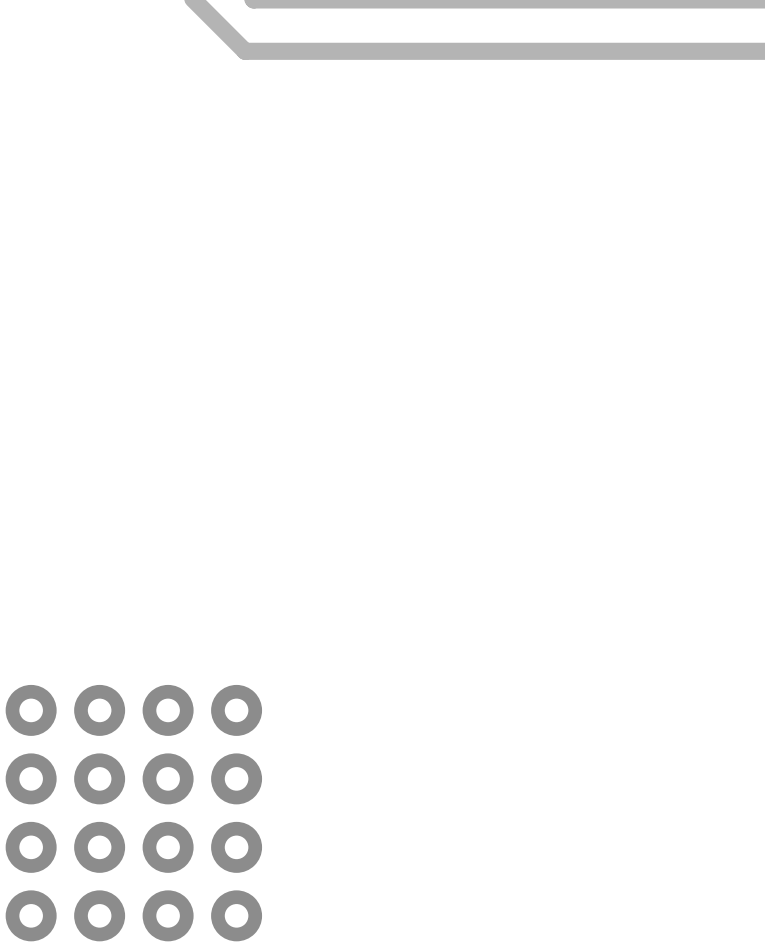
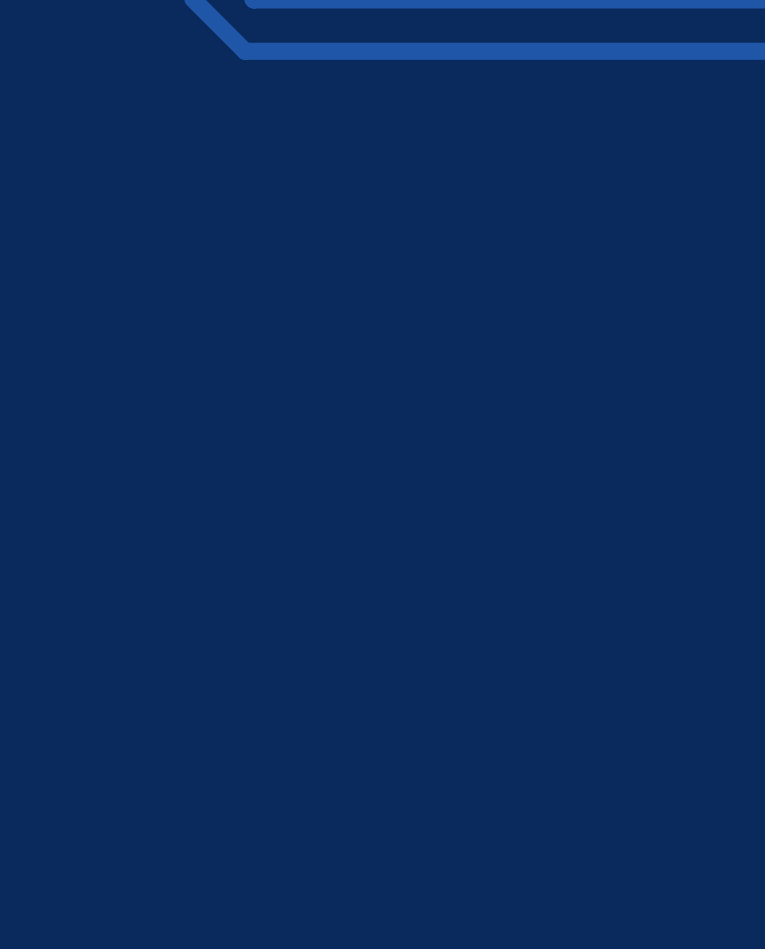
via: (31, 710) -> none
via: (99, 710) -> none
via: (168, 710) -> none
via: (236, 710) -> none
via: (31, 778) -> none
via: (99, 778) -> none
via: (168, 778) -> none
via: (236, 778) -> none
via: (31, 847) -> none
via: (99, 847) -> none
via: (168, 847) -> none
via: (236, 847) -> none
via: (31, 915) -> none
via: (99, 915) -> none
via: (168, 915) -> none
via: (236, 915) -> none

